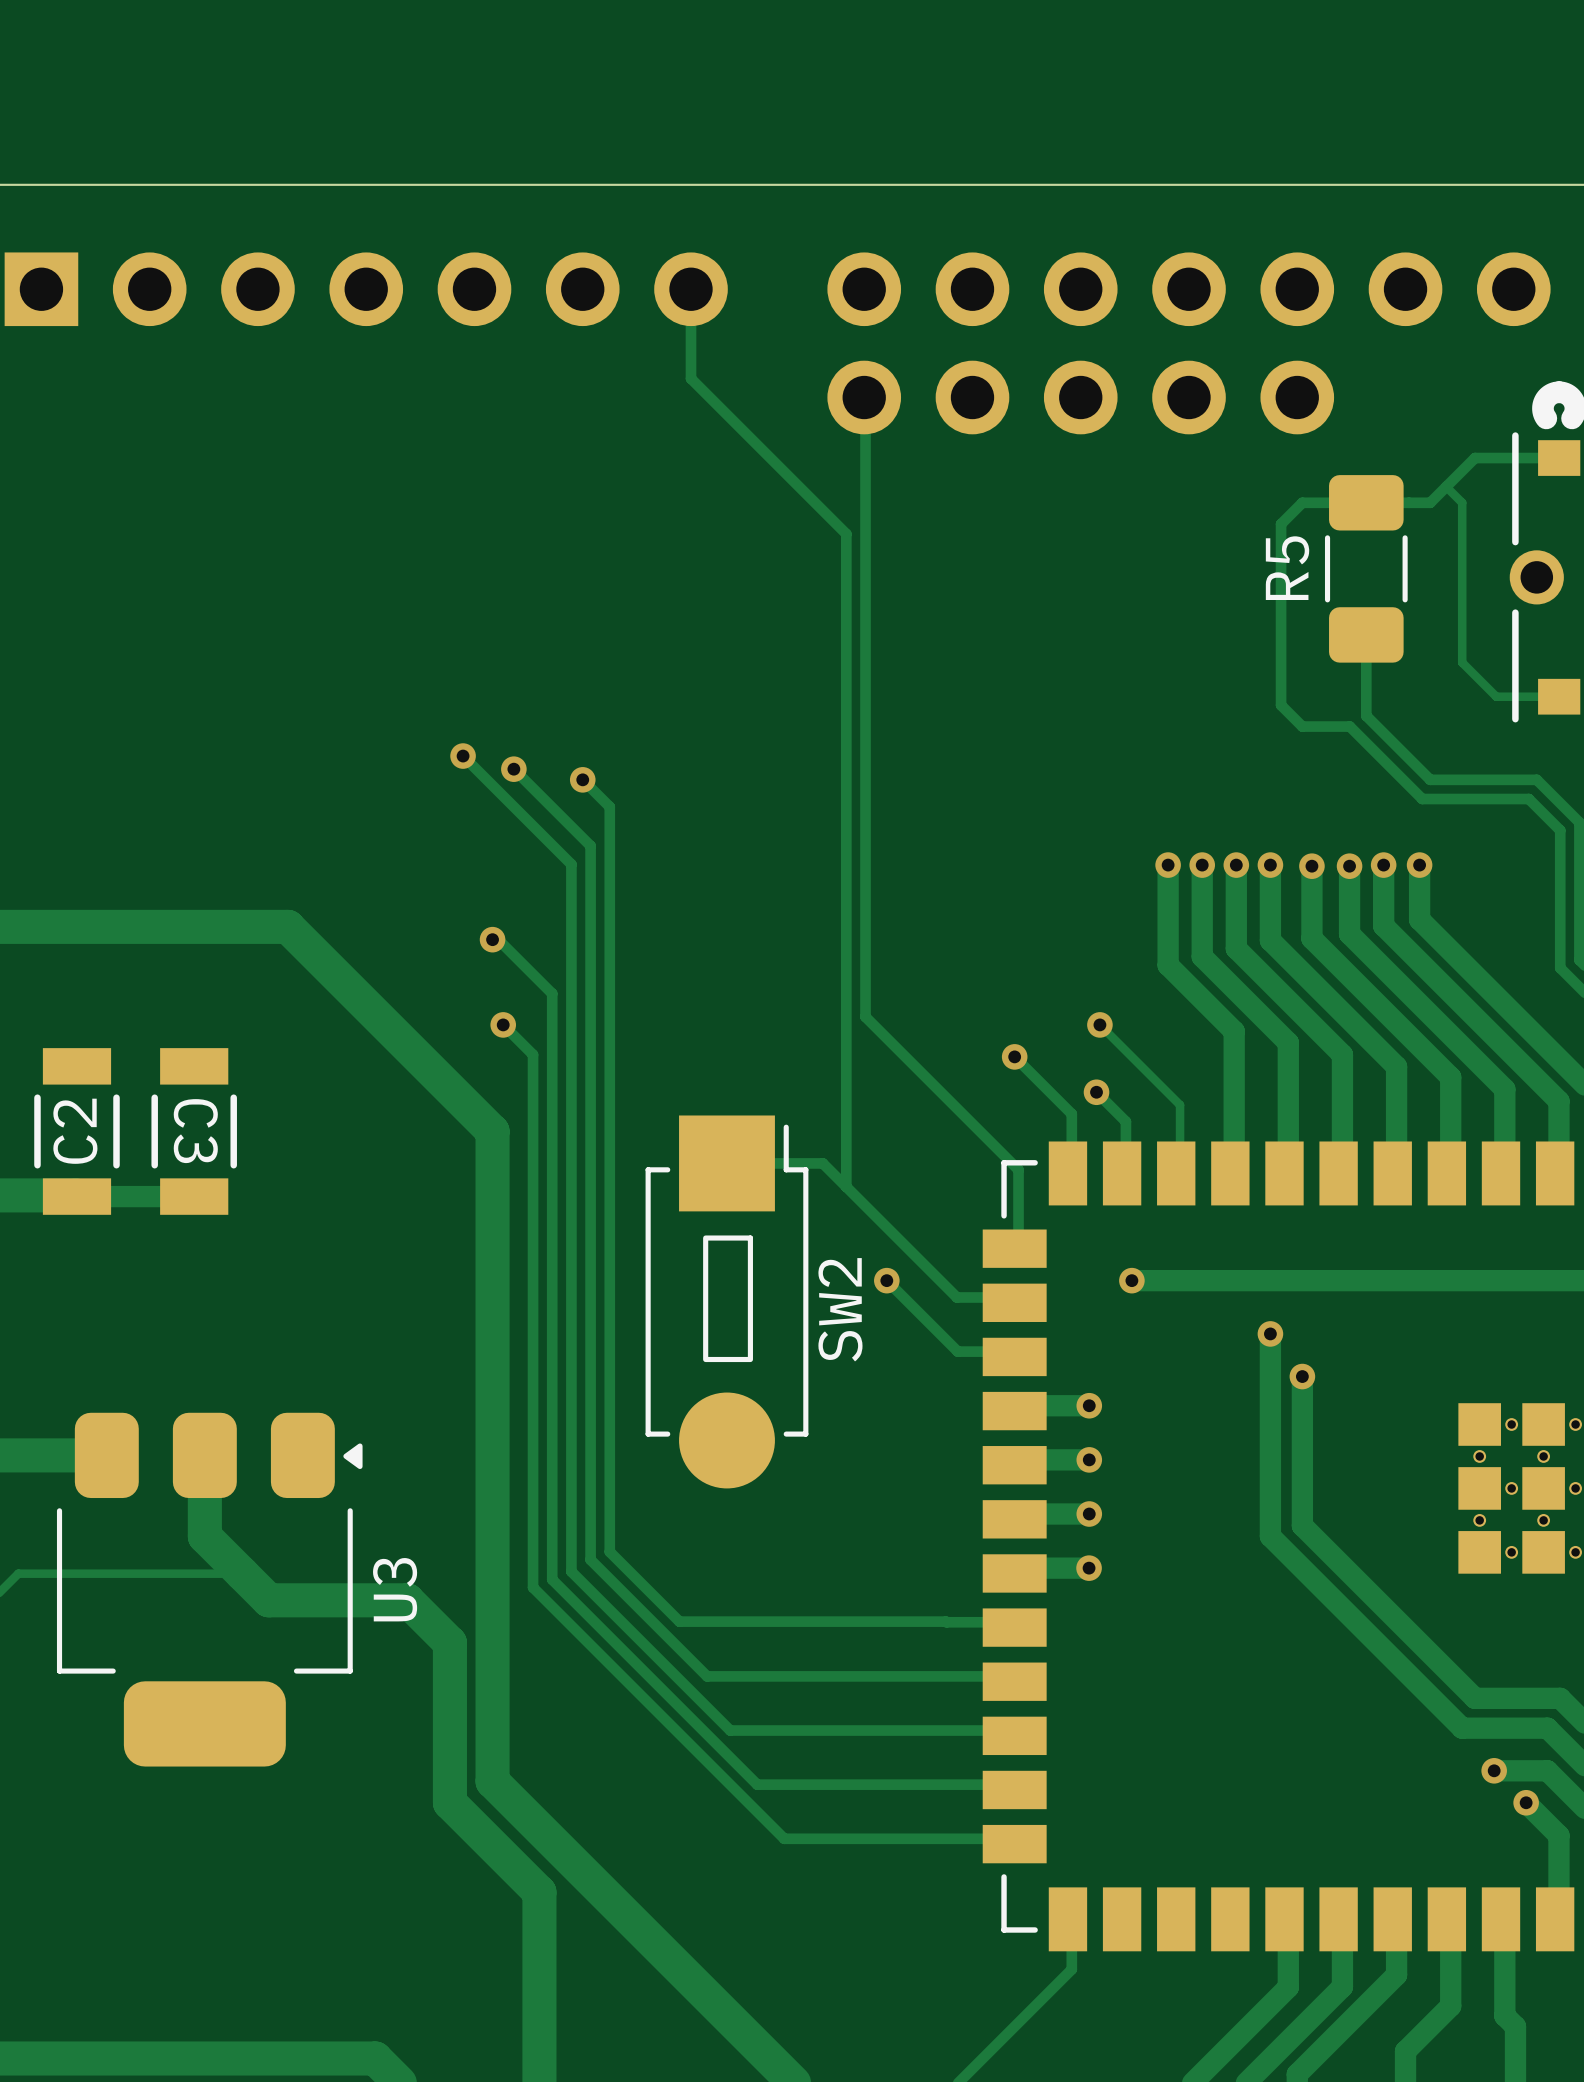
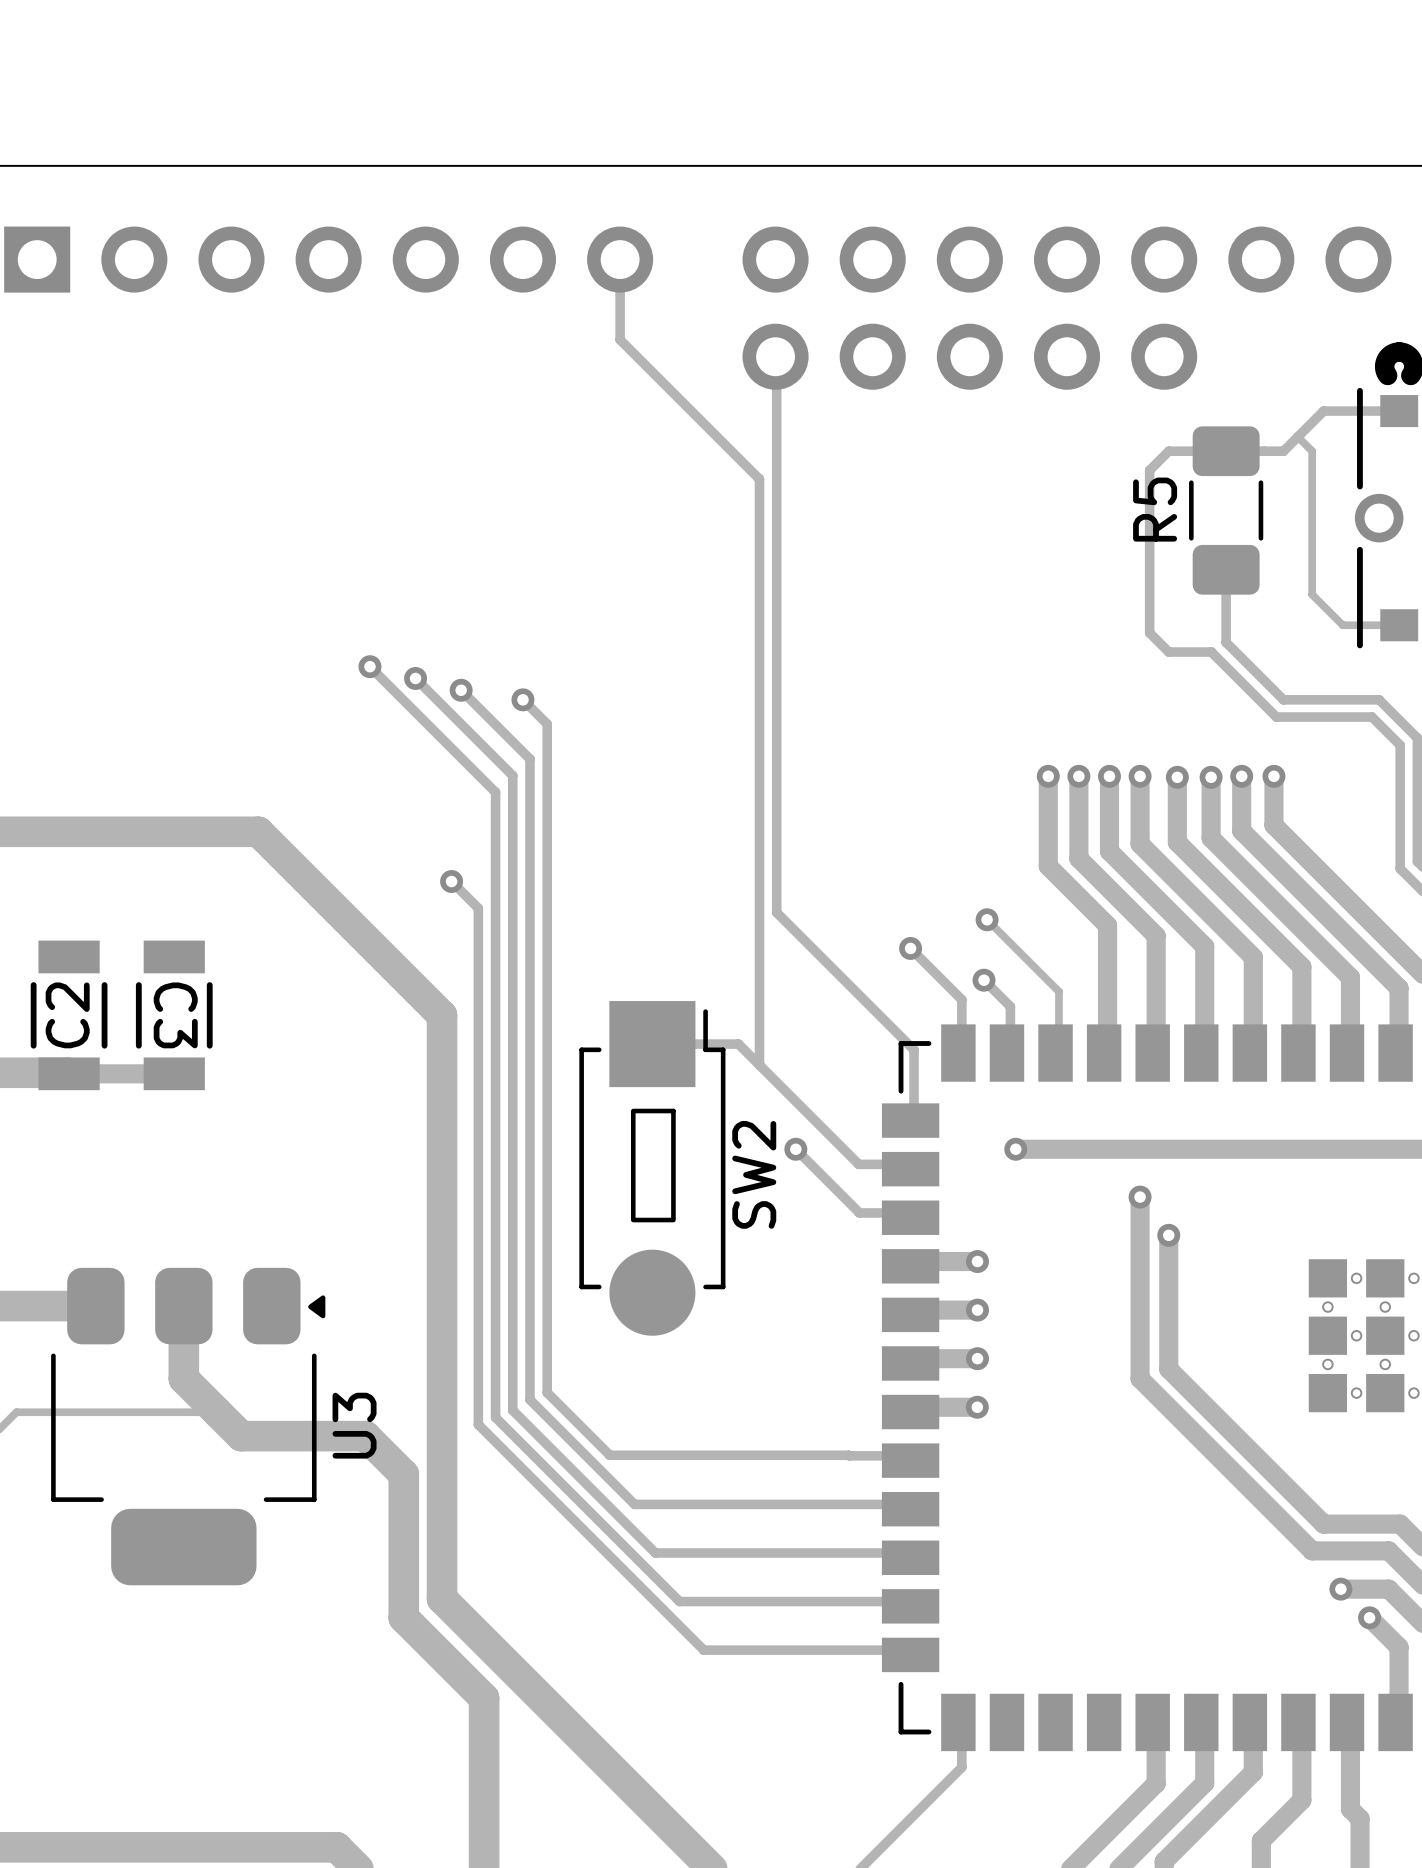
via: none -> (369, 666)
track: (492, 939) (498, 939) (552, 993) -> (369, 666) (495, 792) (495, 891)
via: (492, 939) -> none
via: none -> (451, 881)
track: (503, 1024) (533, 1054) -> (451, 881) (478, 908) (478, 946)
via: (503, 1024) -> none

